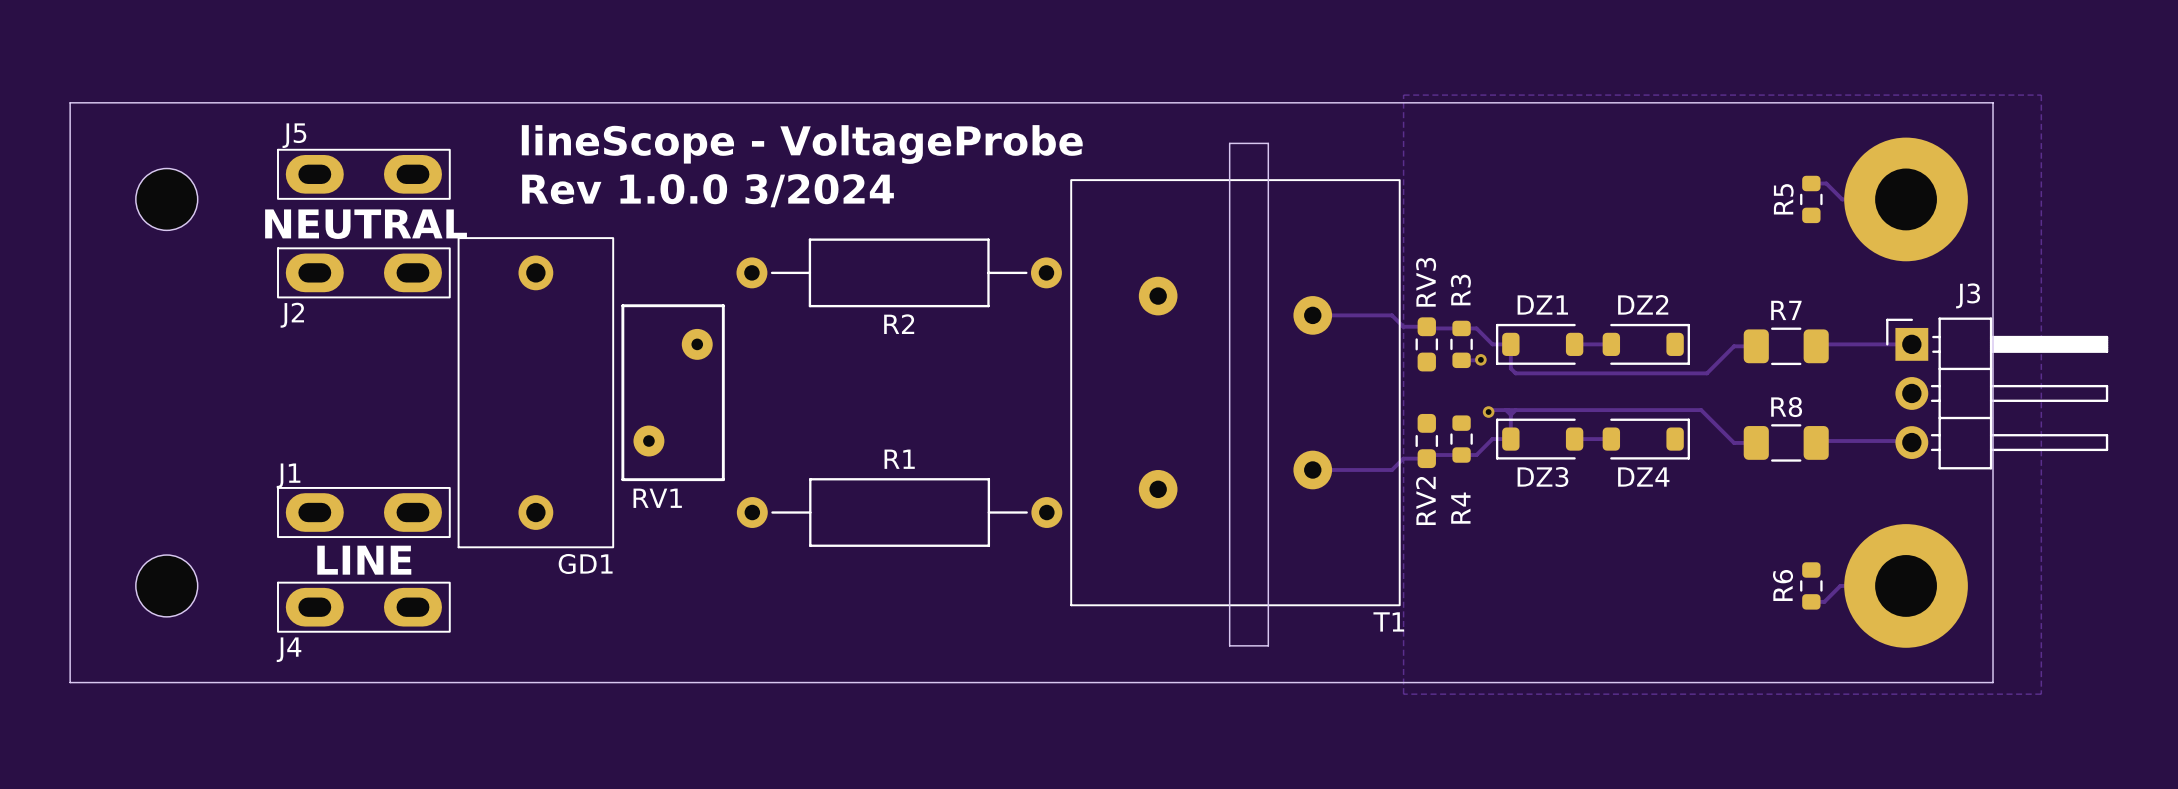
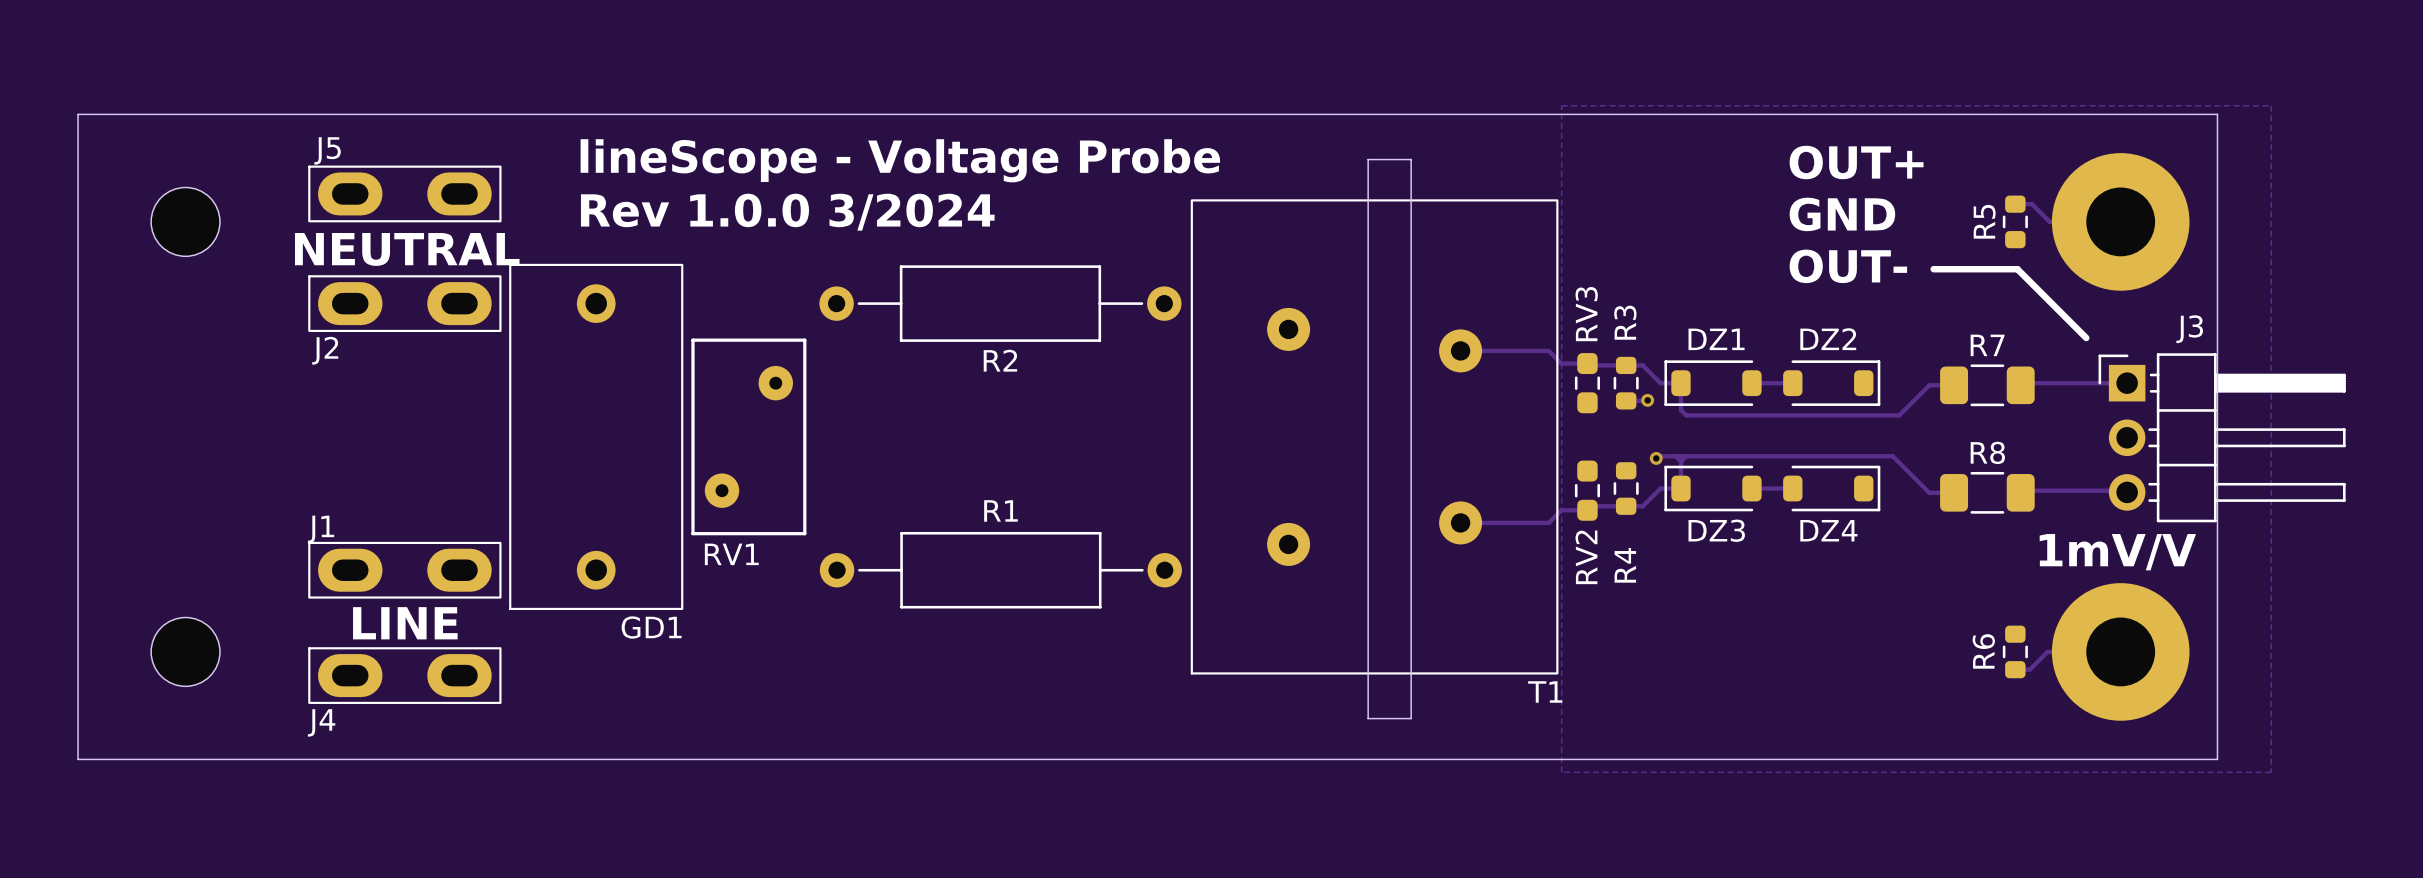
text: lineScope - VoltageProbe (802, 144) -> lineScope - Voltage Probe (900, 160)
text: none -> OUT+ (1856, 162)
text: none -> GND (1842, 214)
text: none -> OUT- (1848, 266)
line: none -> (1933, 269) (2017, 269) (2086, 338)
text: none -> 1mV/V (2117, 552)

